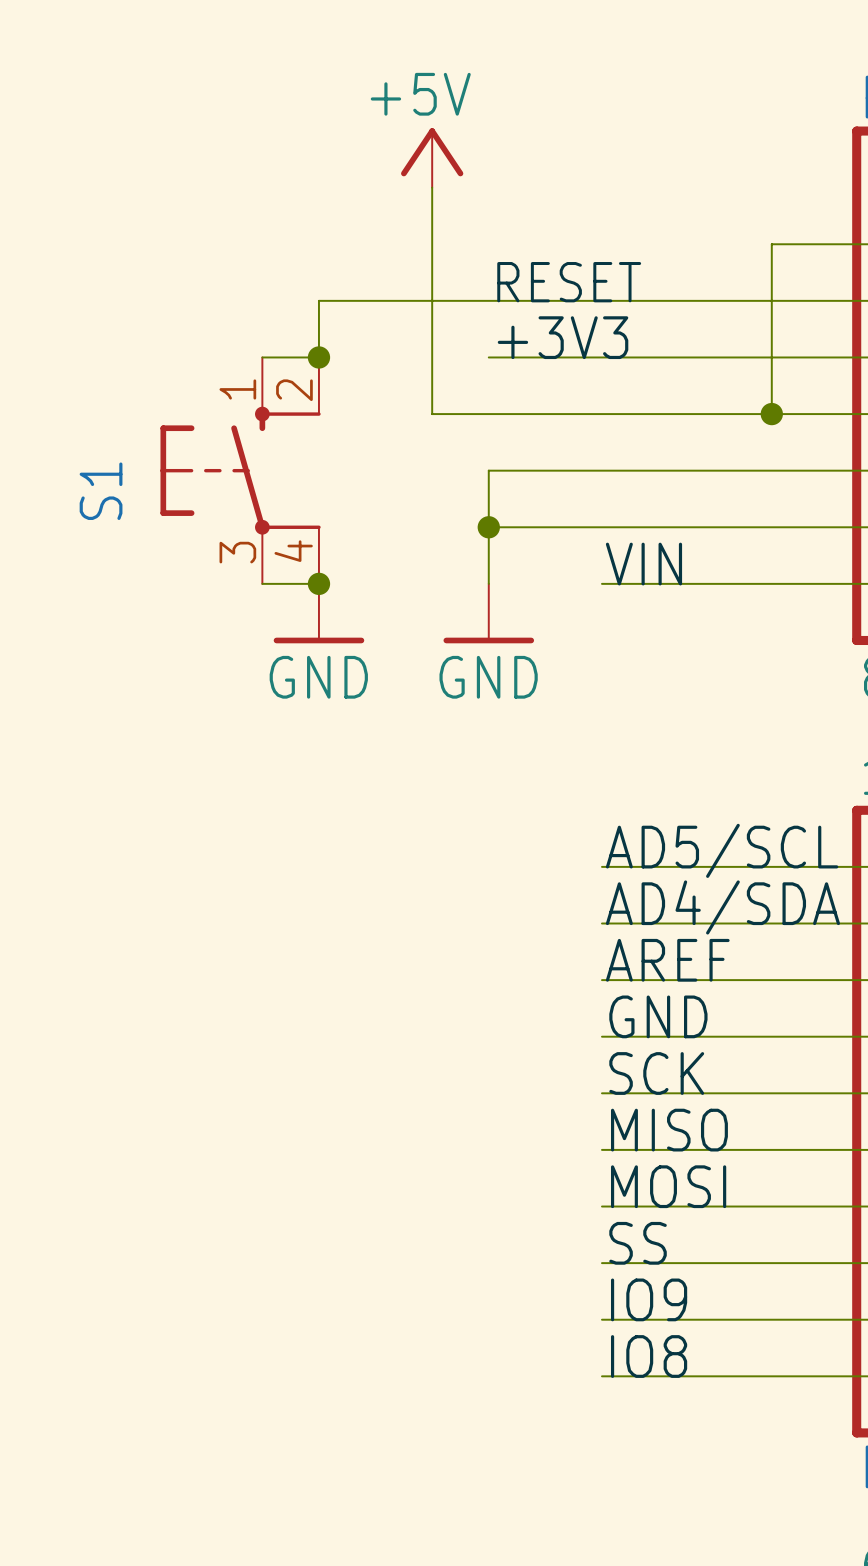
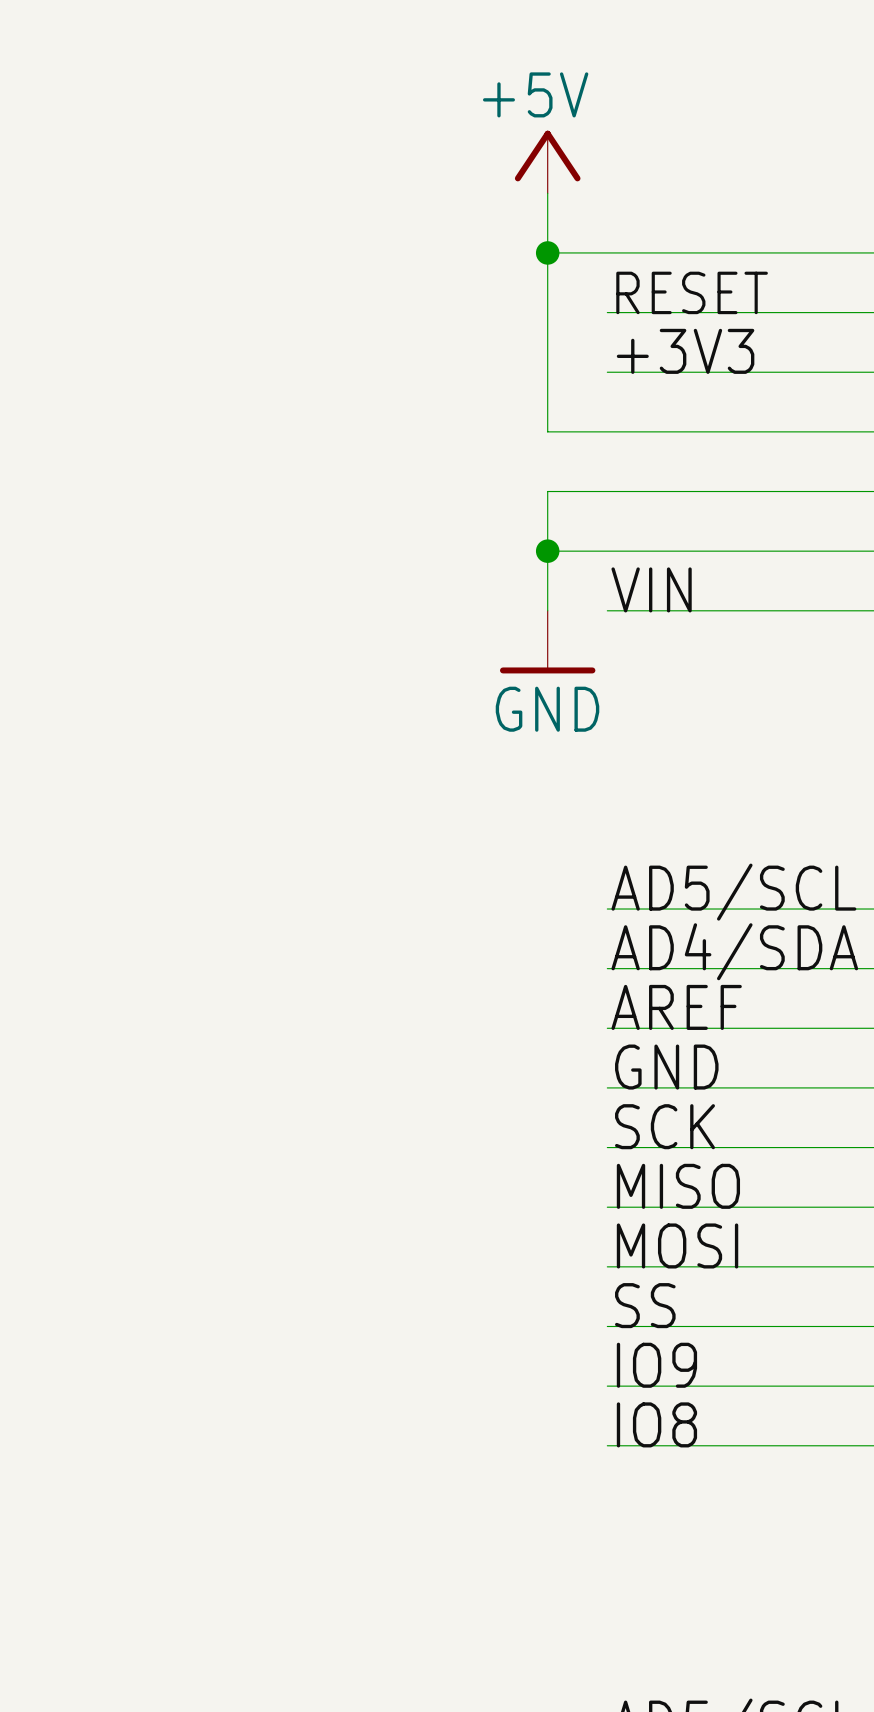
power symbol position: +5V (432, 157) -> +5V (547, 162)
wire: (432, 187) (432, 414) (545, 414) -> (547, 193) (547, 431)
junction: none -> (547, 252)
wire: (771, 244) (771, 414) -> (786, 252) (547, 252)
label position: RESET (569, 282) -> RESET (692, 292)
wire: (601, 300) (318, 300) (318, 357) (262, 357) -> none
label position: +3V3 (563, 337) -> +3V3 (685, 351)
junction: (318, 357) -> none
wire: (488, 357) (601, 357) -> none
junction: (771, 414) -> none
S1: (240, 470) -> none
wire: (545, 470) (488, 470) (488, 583) -> (547, 491) (547, 610)
wire: (488, 527) (545, 527) -> none
junction position: (488, 527) -> (547, 551)
wire: (262, 583) (318, 583) -> none
junction: (318, 583) -> none
power symbol: GND (318, 613) -> none
power symbol position: GND (488, 613) -> GND (547, 642)

